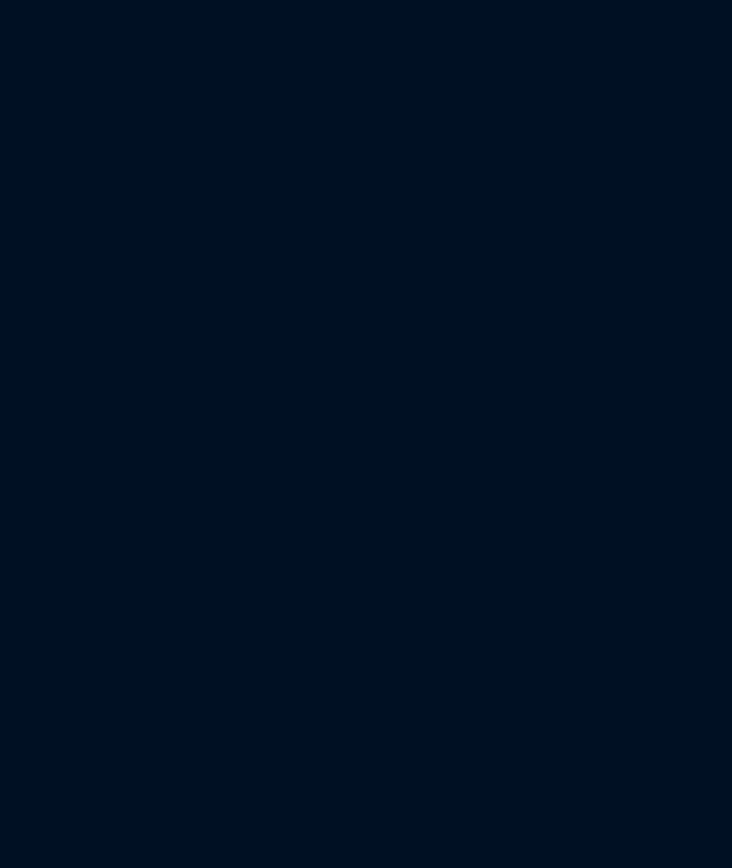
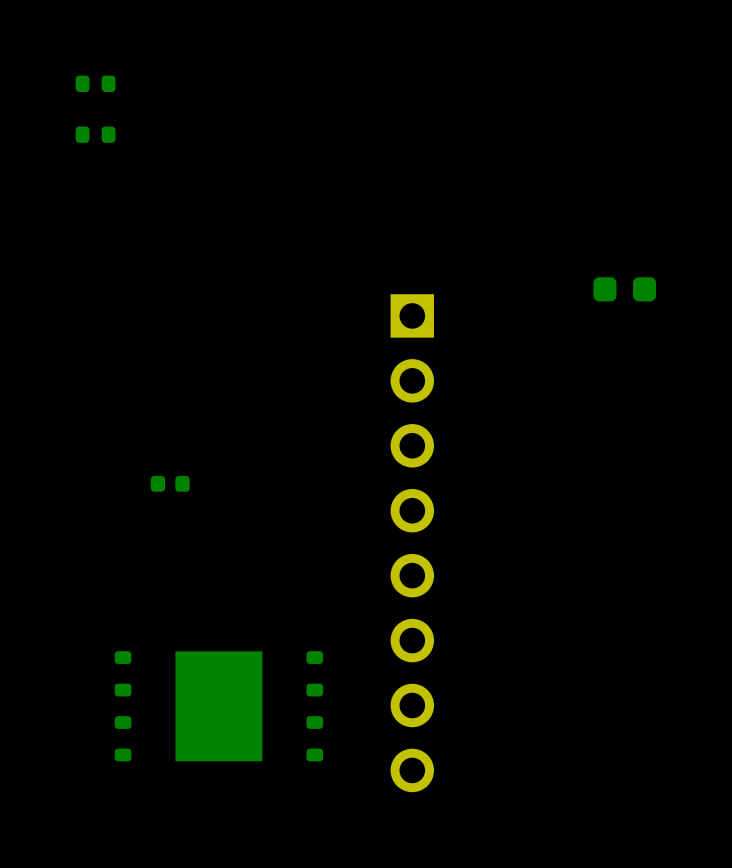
part: none -> (95, 83)
part: none -> (95, 134)
part: none -> (624, 289)
part: none -> (170, 483)
part: none -> (412, 543)
part: none -> (218, 706)

